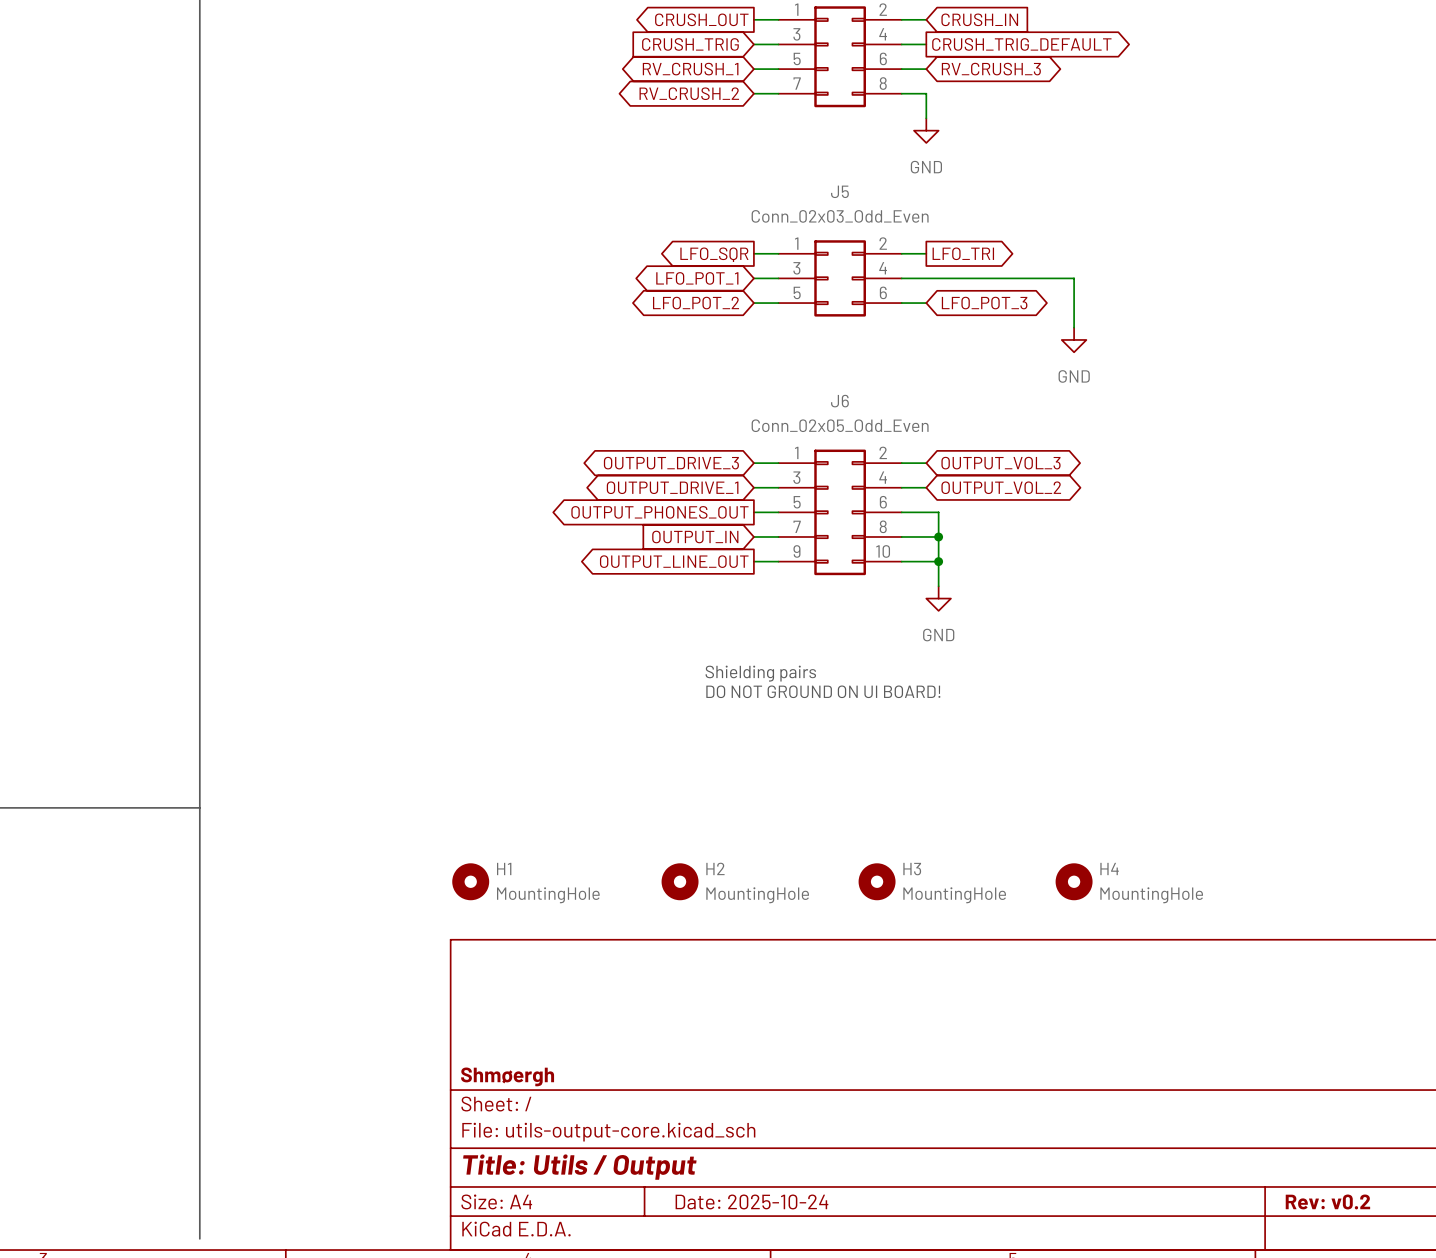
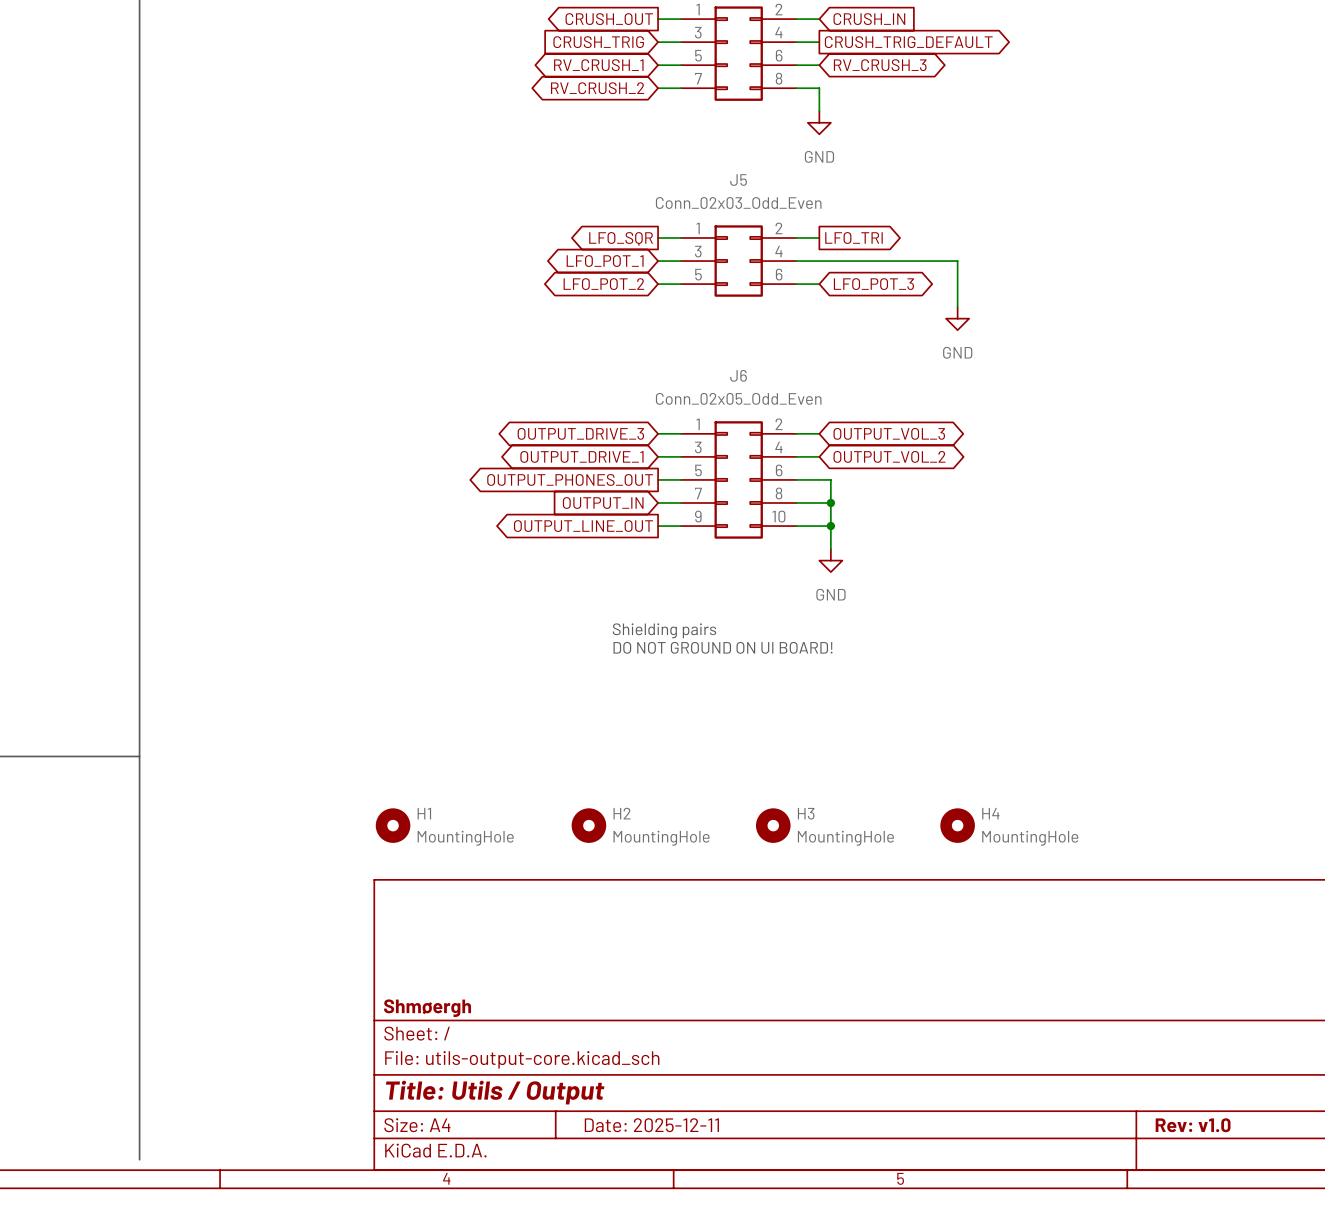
title block: Date: 2025-10-24 (751, 1201) -> Date: 2025-12-11 (651, 1125)
title block: Rev: v0.2 (1327, 1201) -> Rev: v1.0 (1193, 1125)

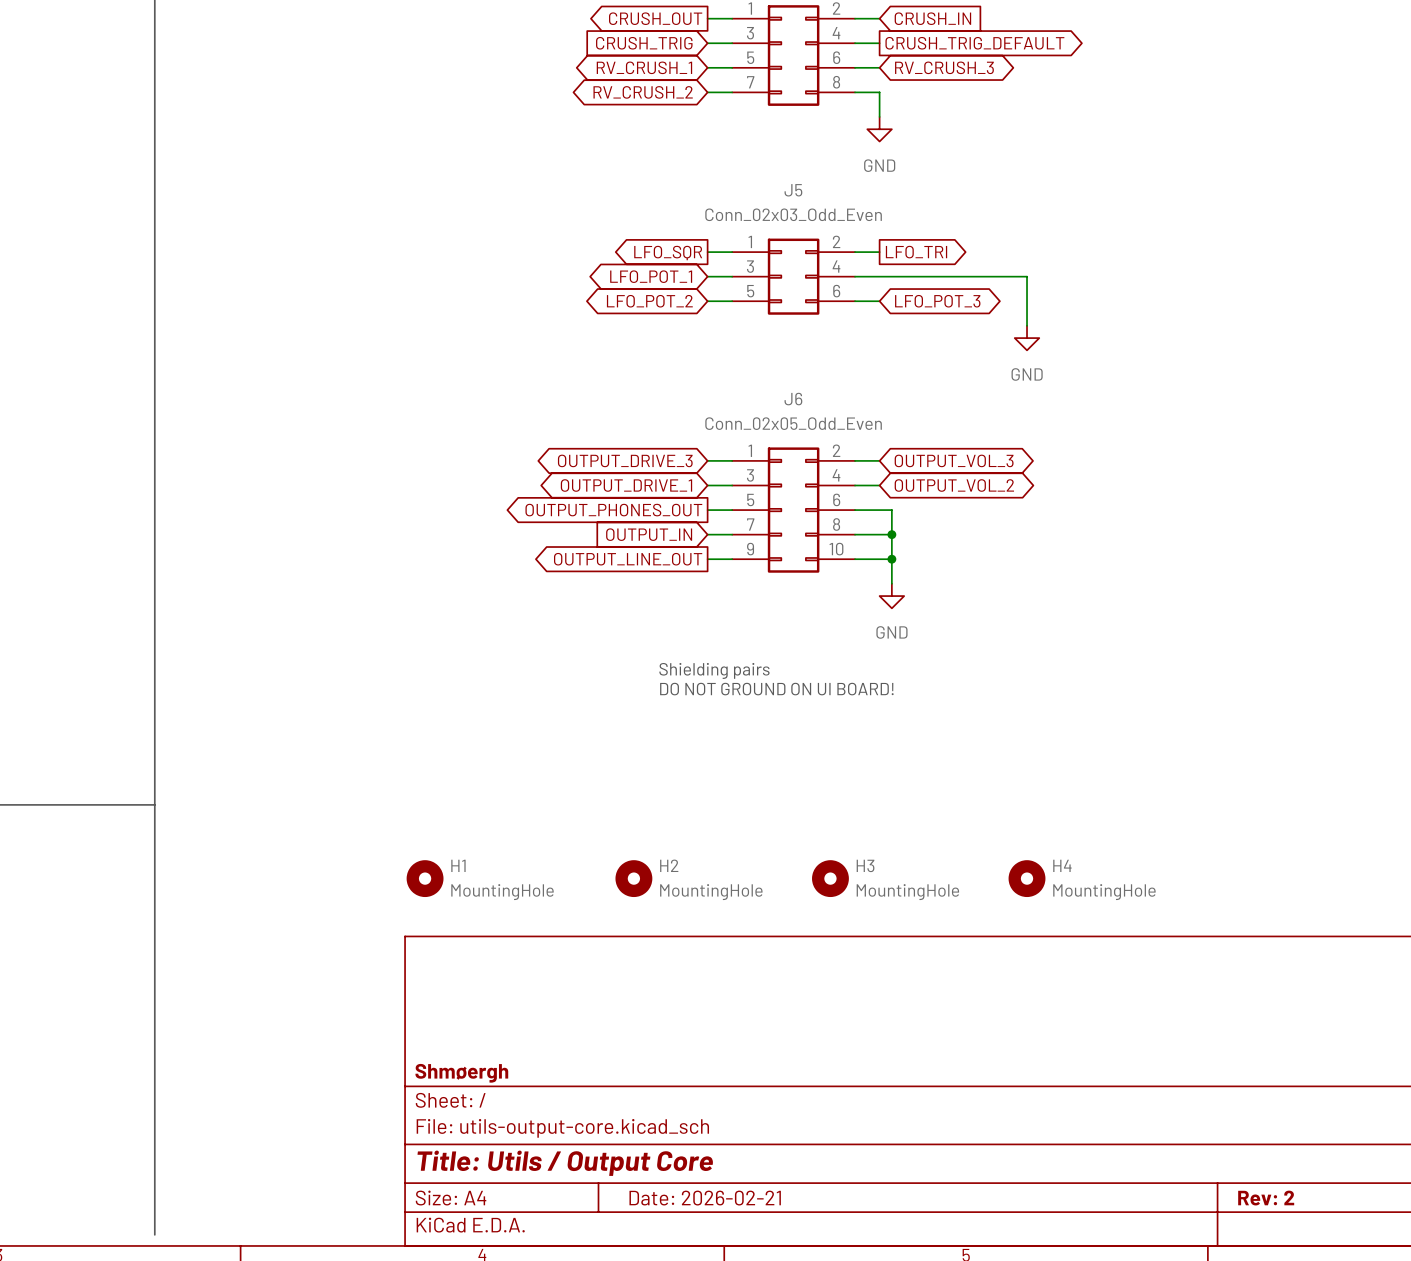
title block: Title: Utils / Output (495, 1092) -> Title: Utils / Output Core (565, 1163)
title block: Date: 2025-12-11 (651, 1125) -> Date: 2026-02-21 (705, 1198)
title block: Rev: v1.0 (1193, 1125) -> Rev: 2 (1266, 1198)

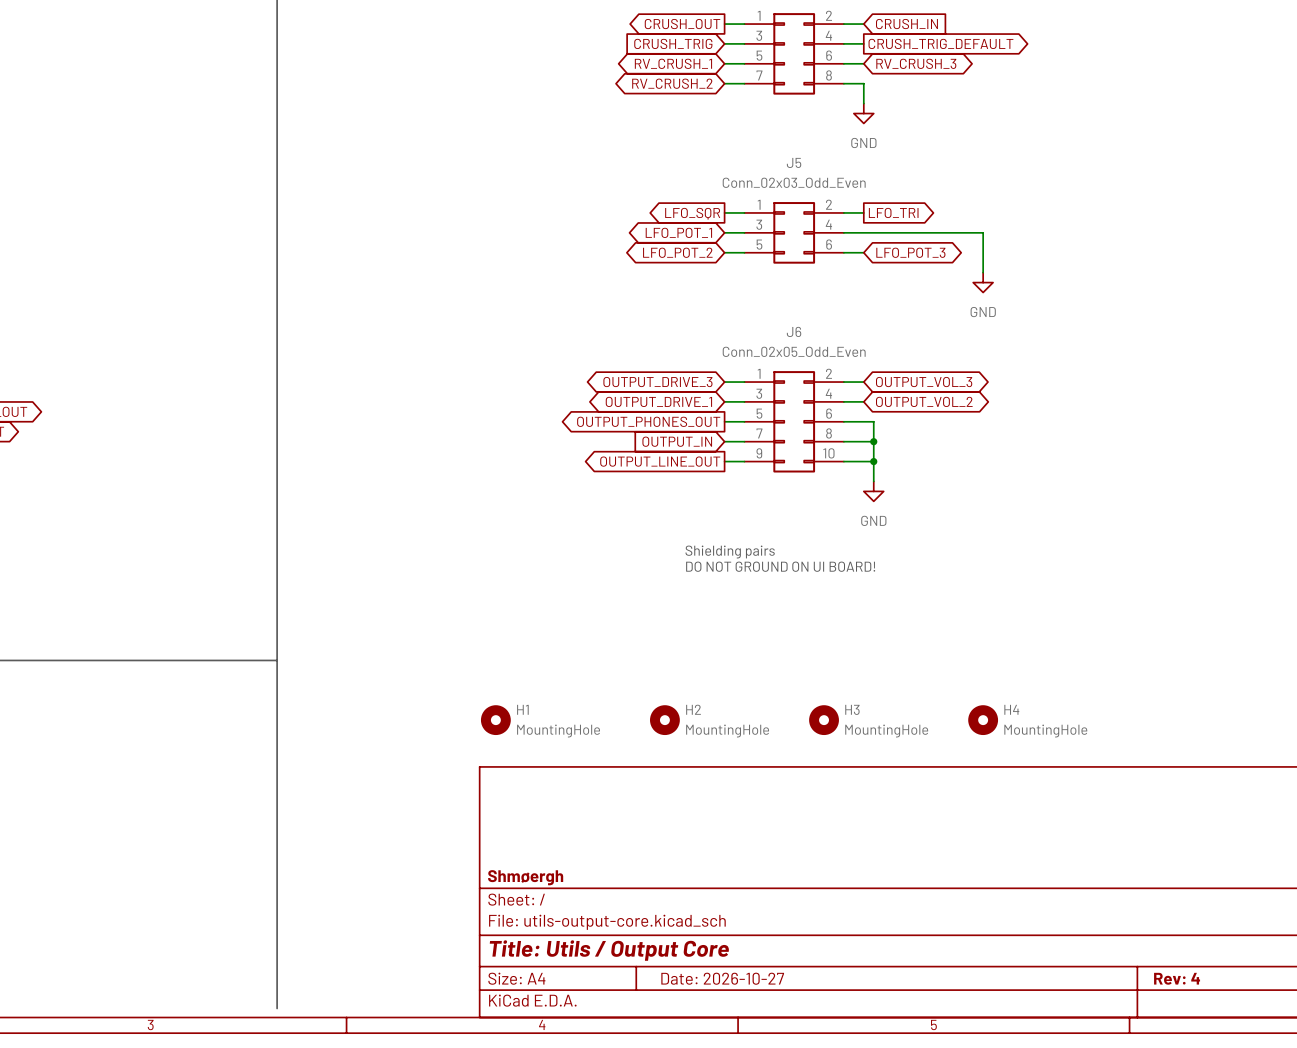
title block: Date: 2026-02-21 (705, 1198) -> Date: 2026-10-27 (722, 978)
title block: Rev: 2 (1266, 1198) -> Rev: 4 (1177, 978)

